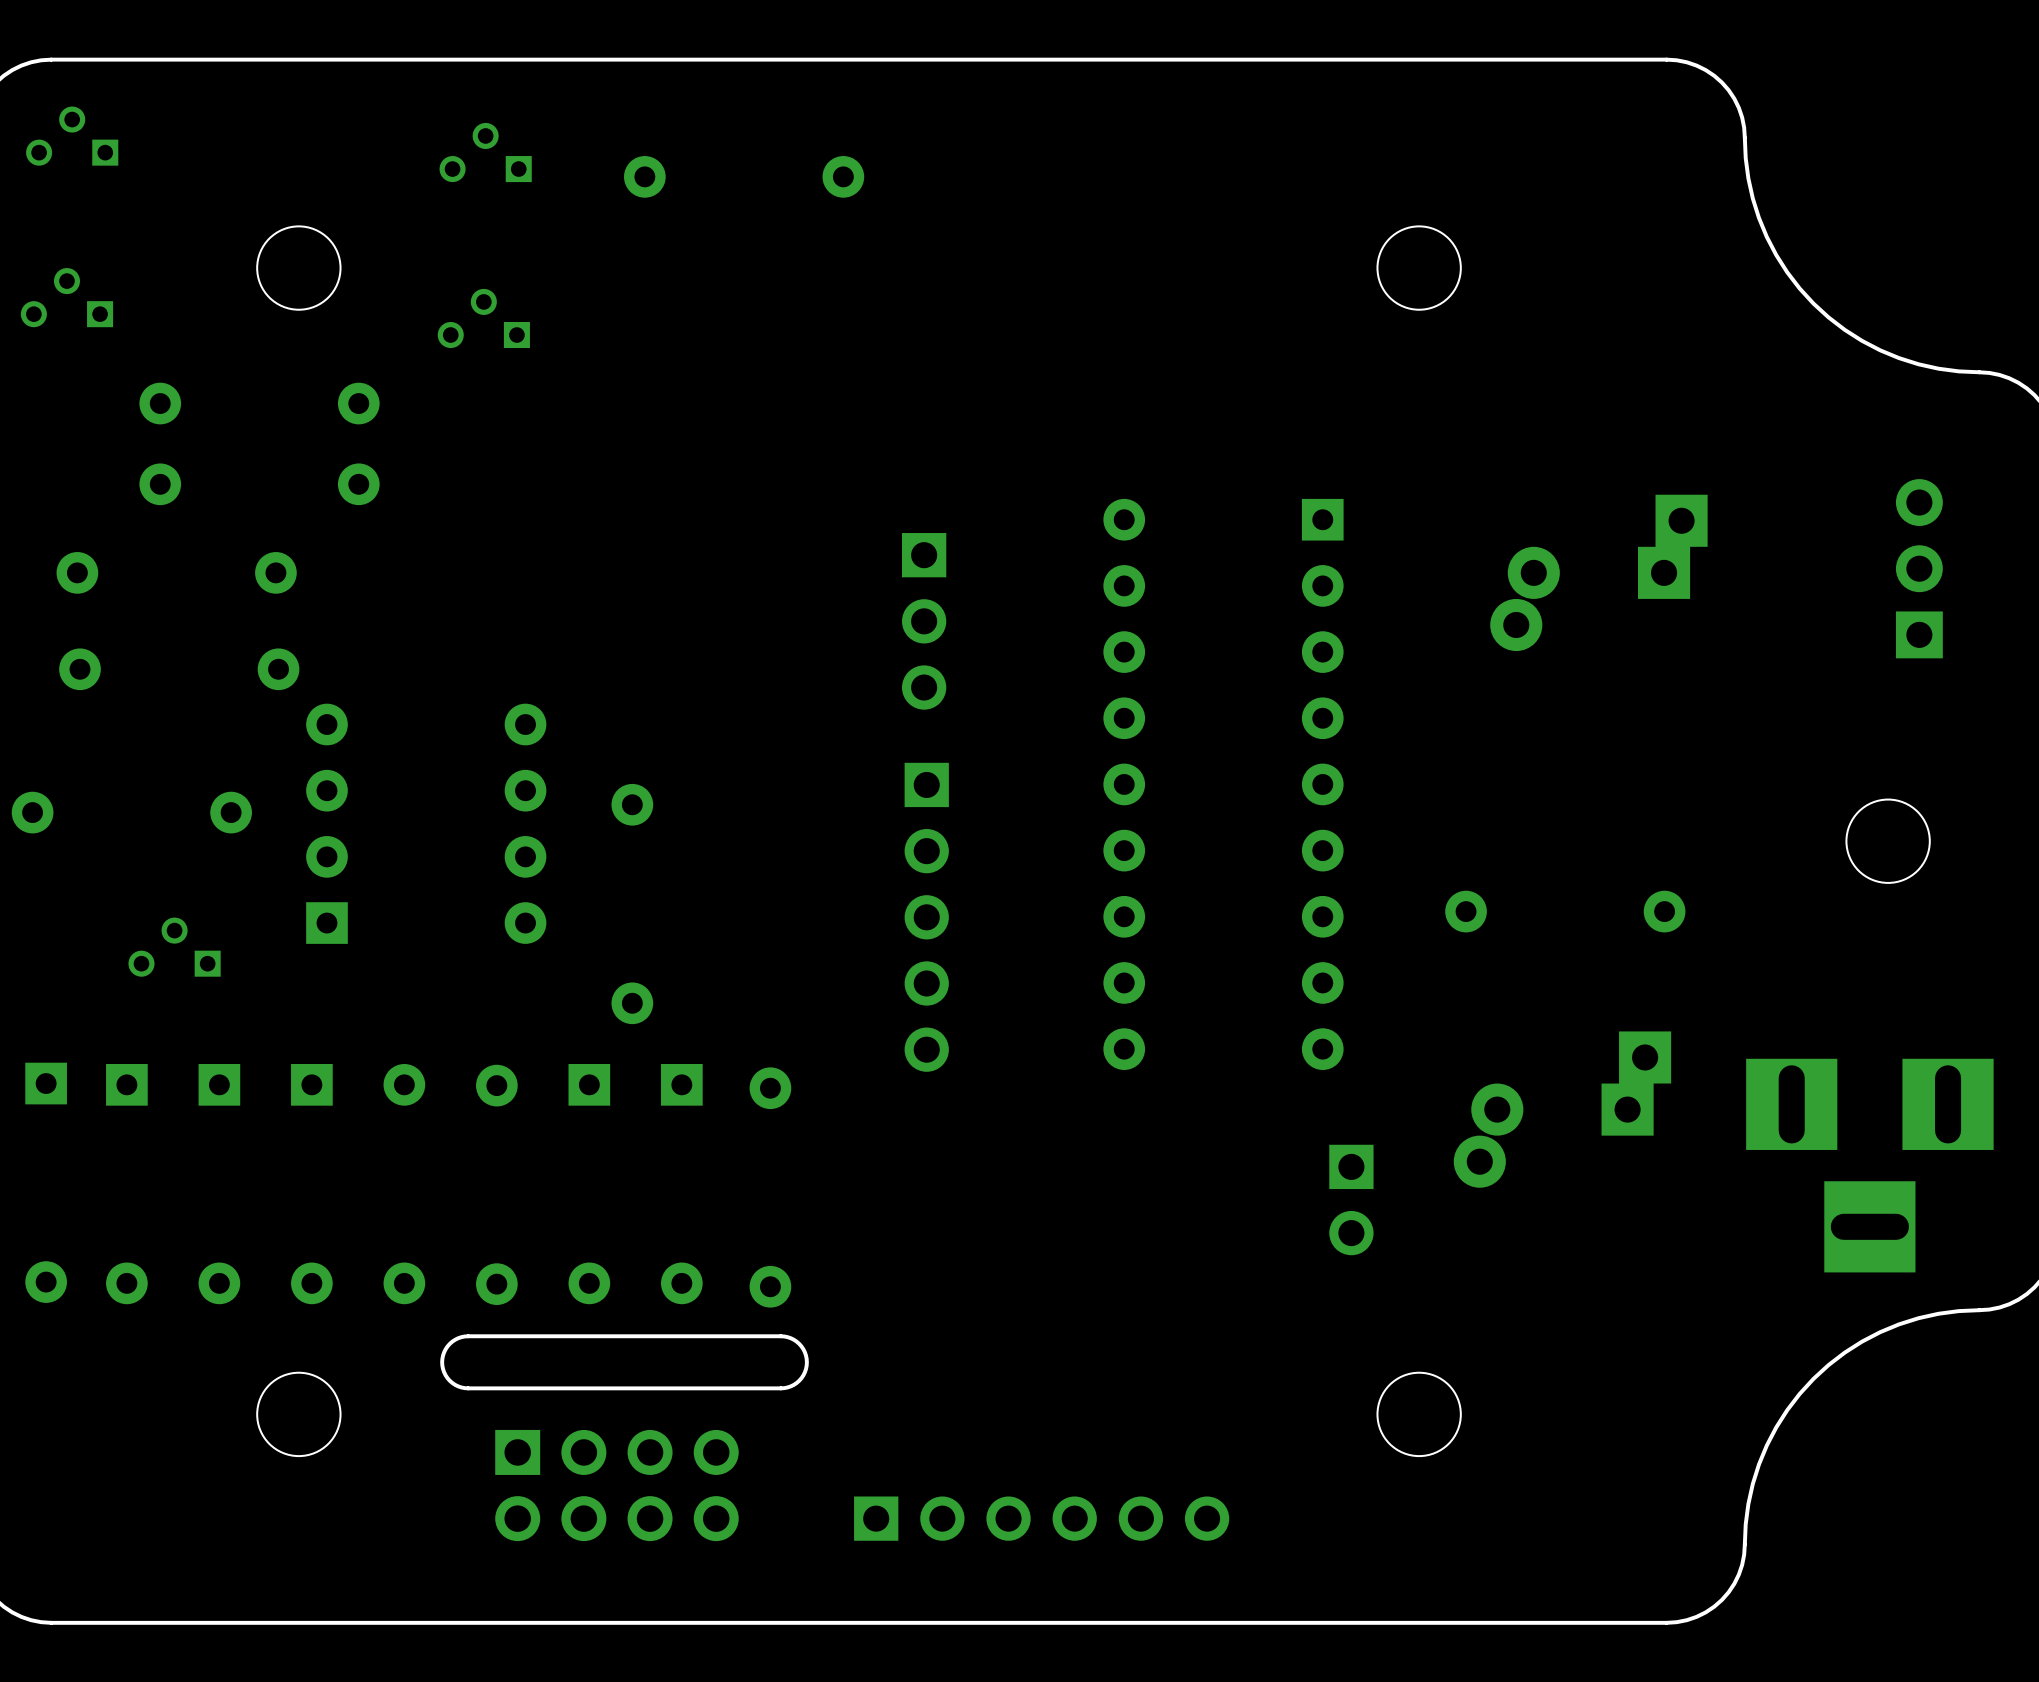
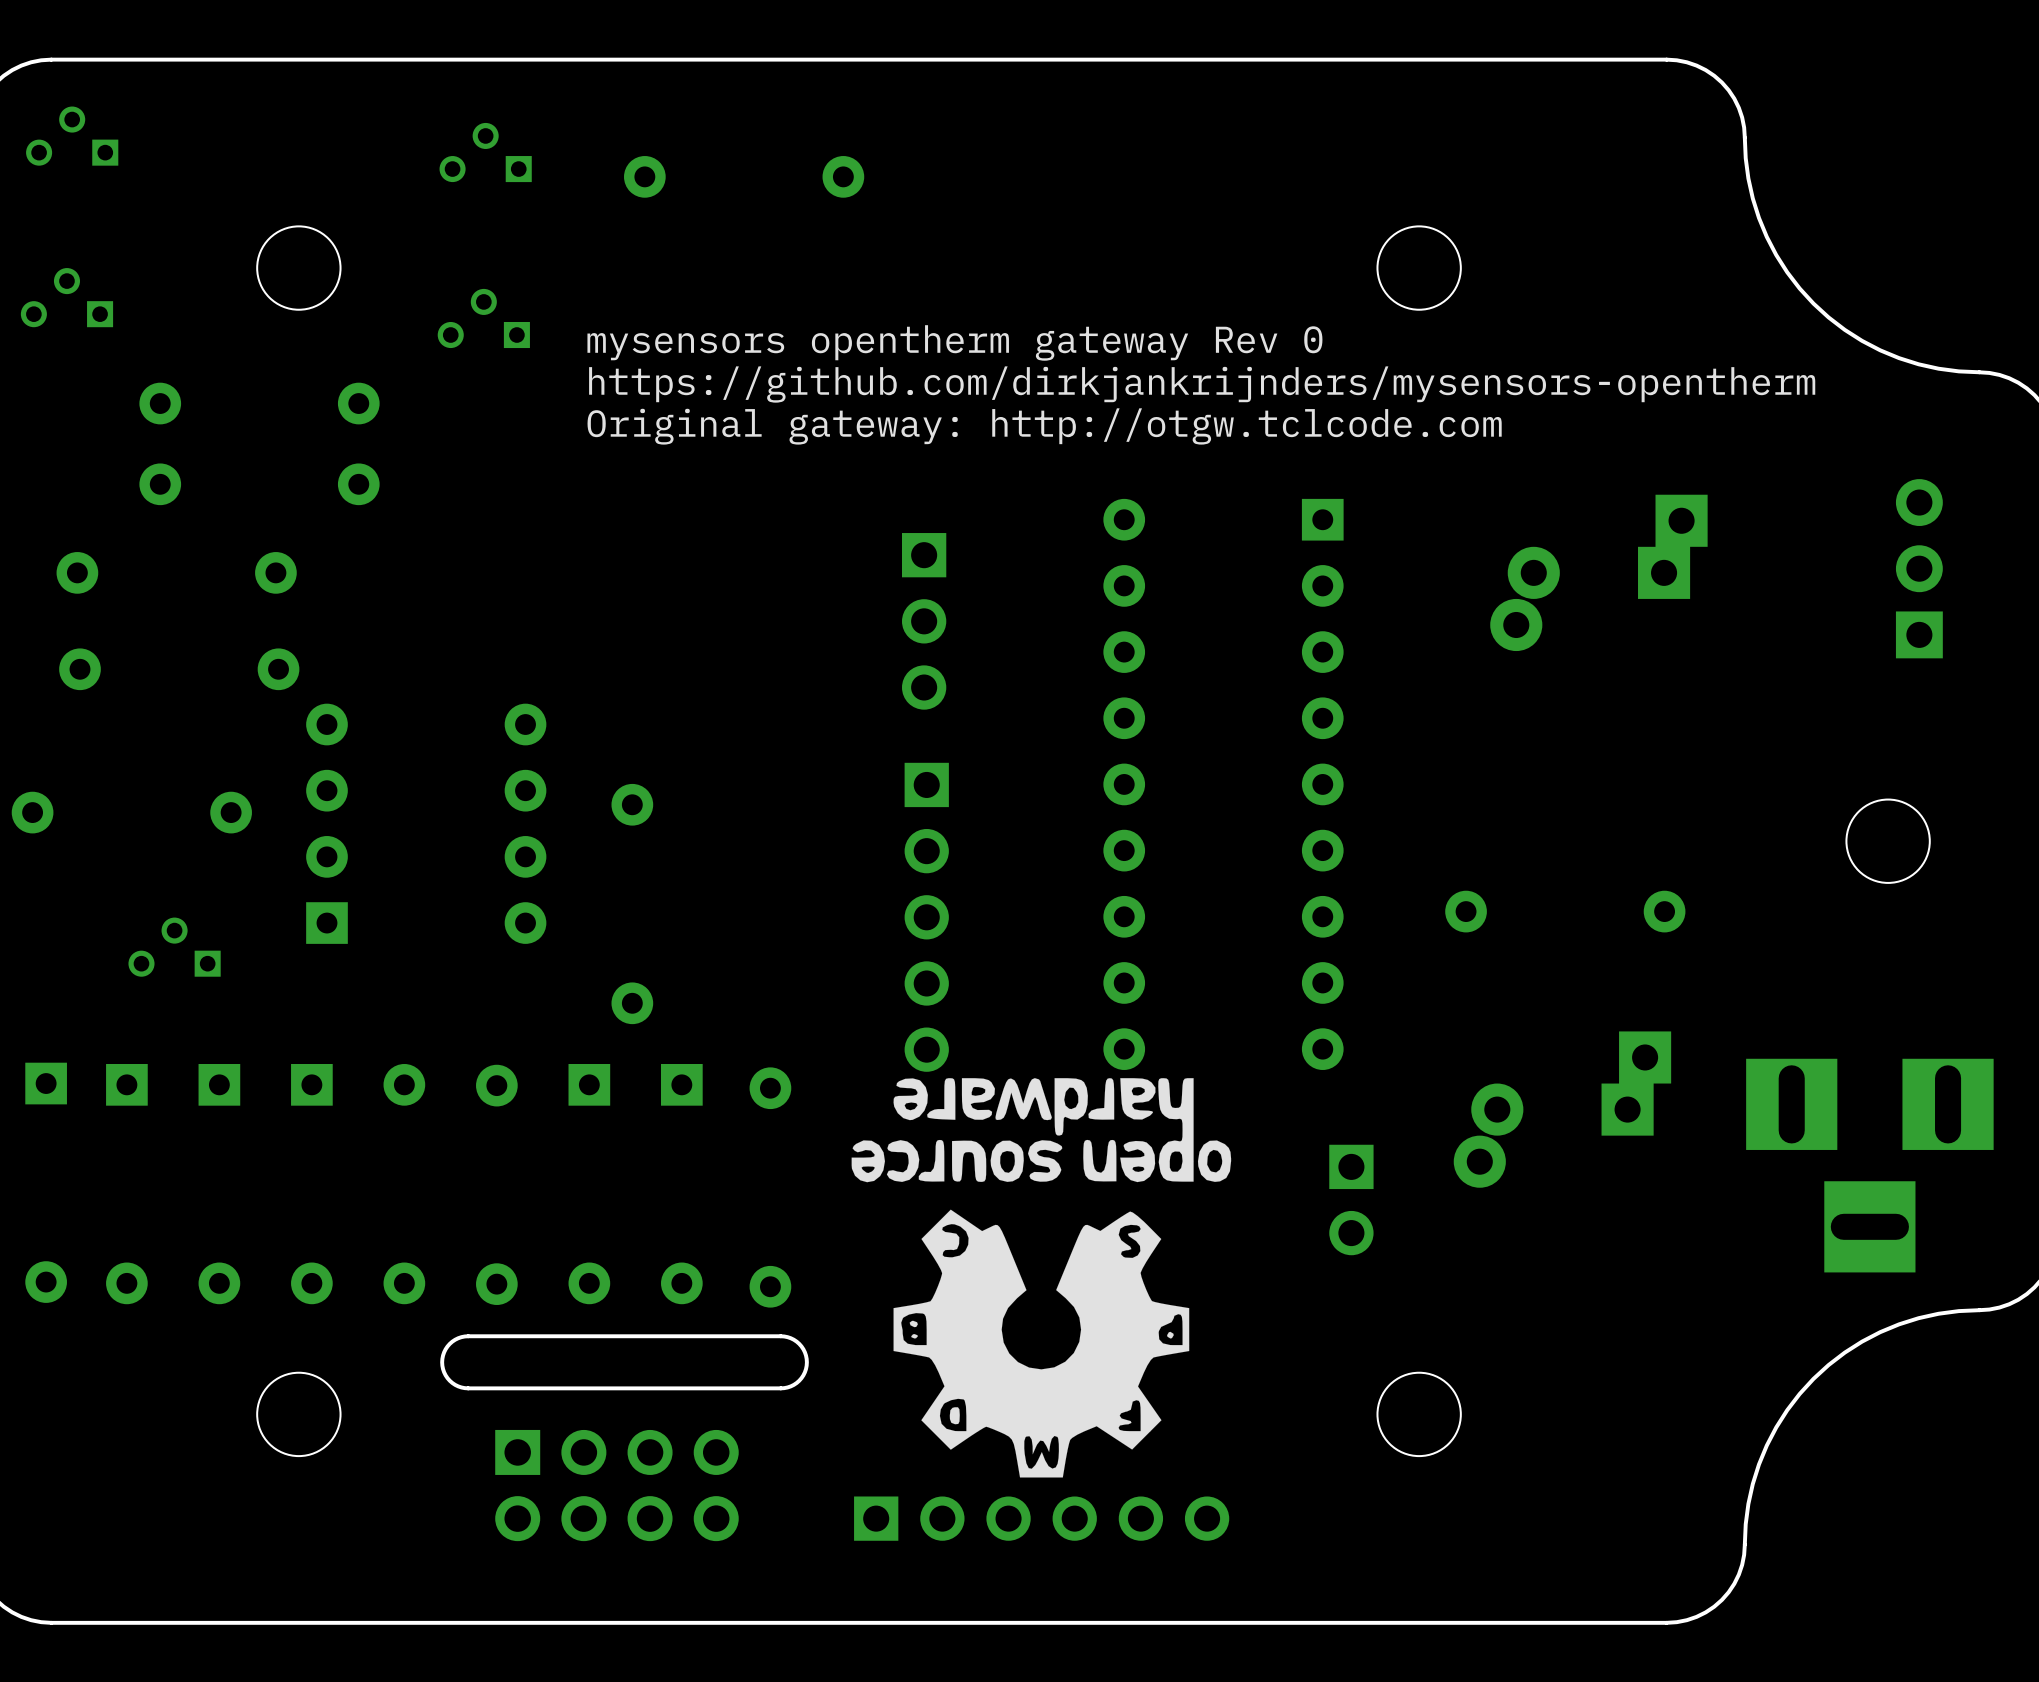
text: none -> mysensors opentherm gateway Rev 0 (954, 342)
text: none -> https://github.com/dirkjankrijnders/mysensors-opentherm (1202, 384)
text: none -> Original gateway: http://otgw.tclcode.com (1044, 426)
drawing: none -> [851, 1078, 1232, 1478]

